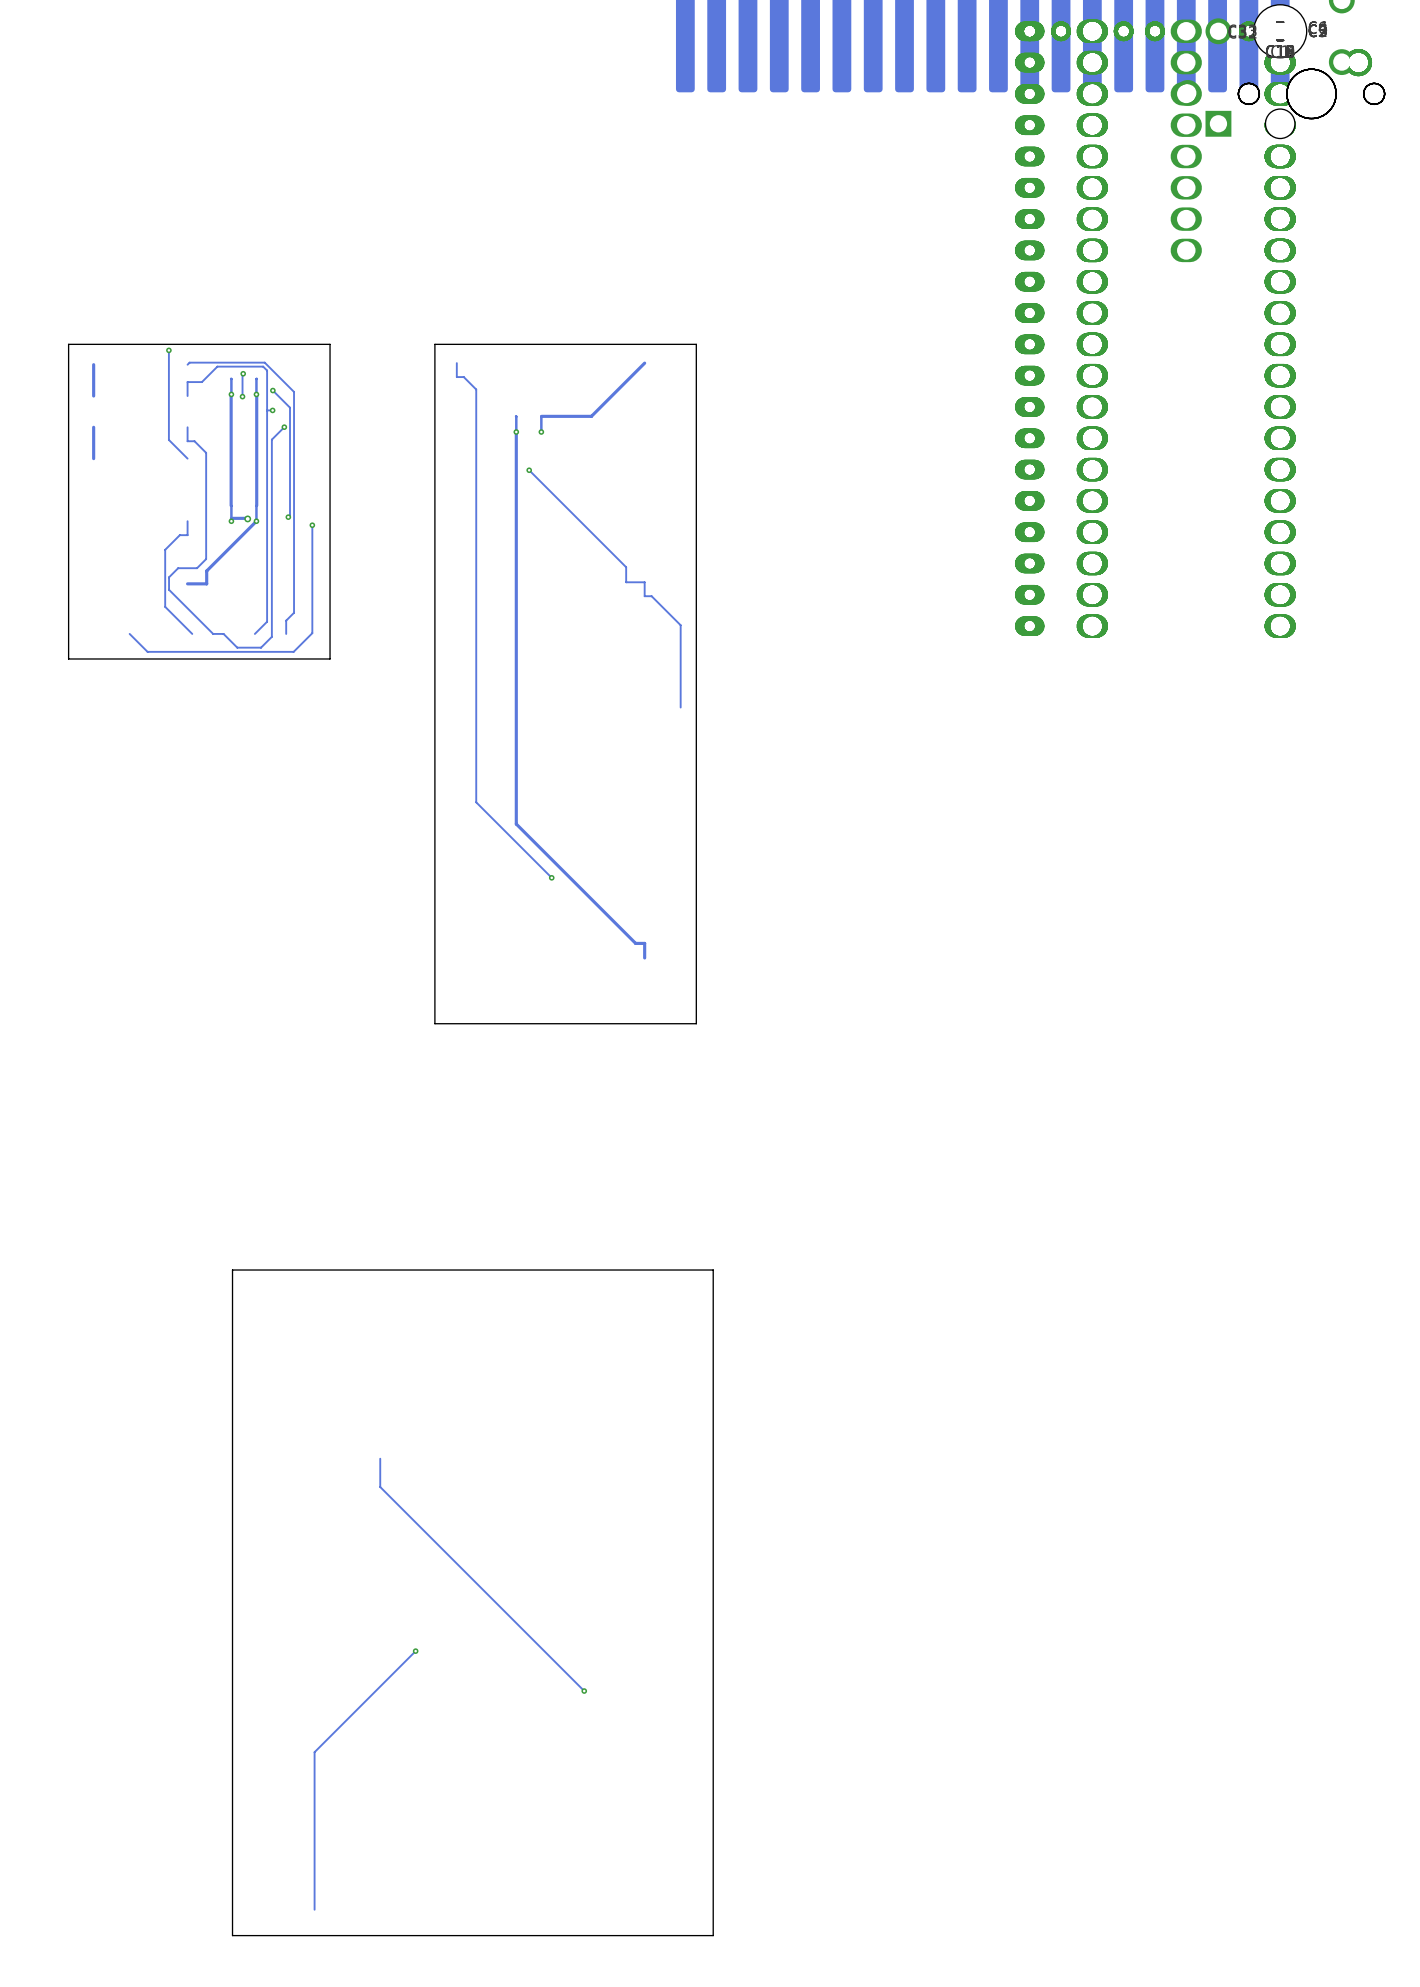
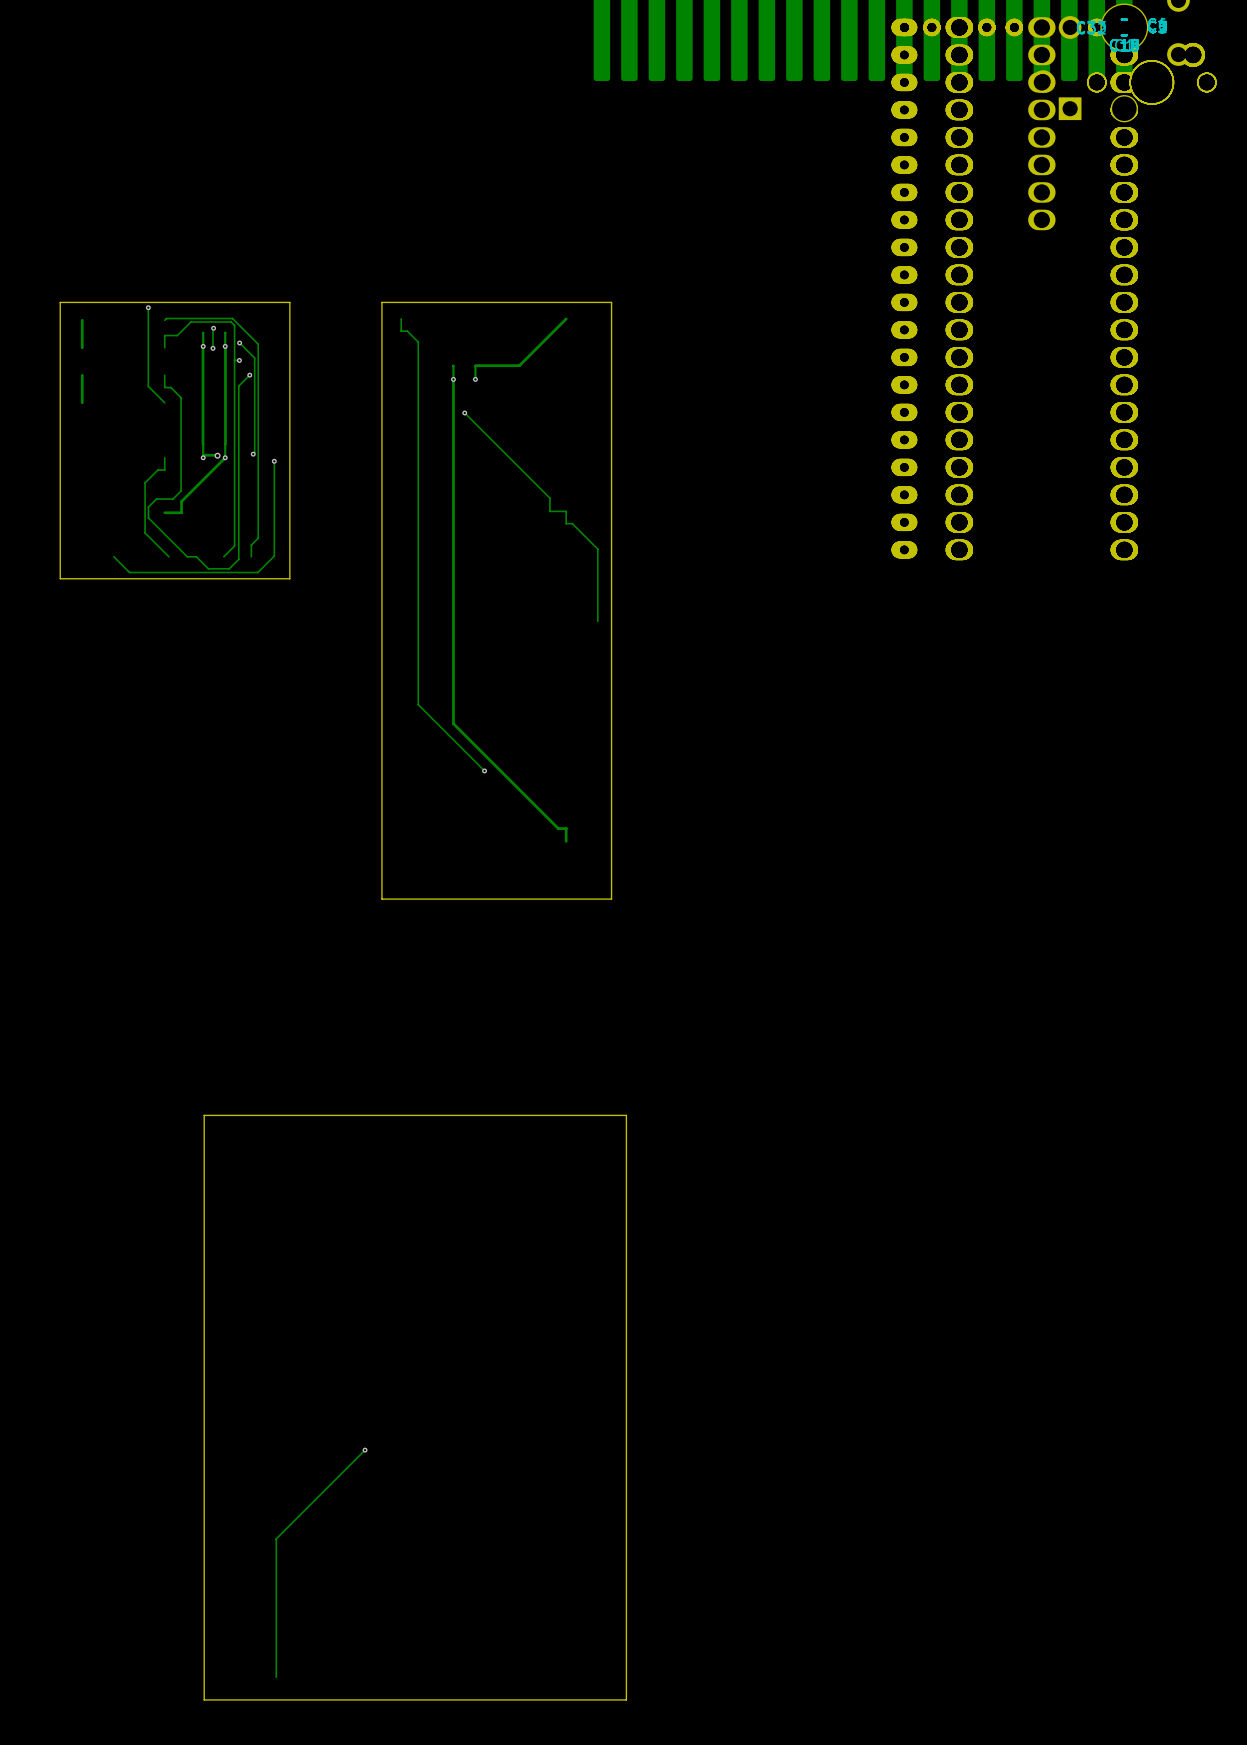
track: (380, 1458) (380, 1487) (584, 1691) -> none
via: (584, 1691) -> none

